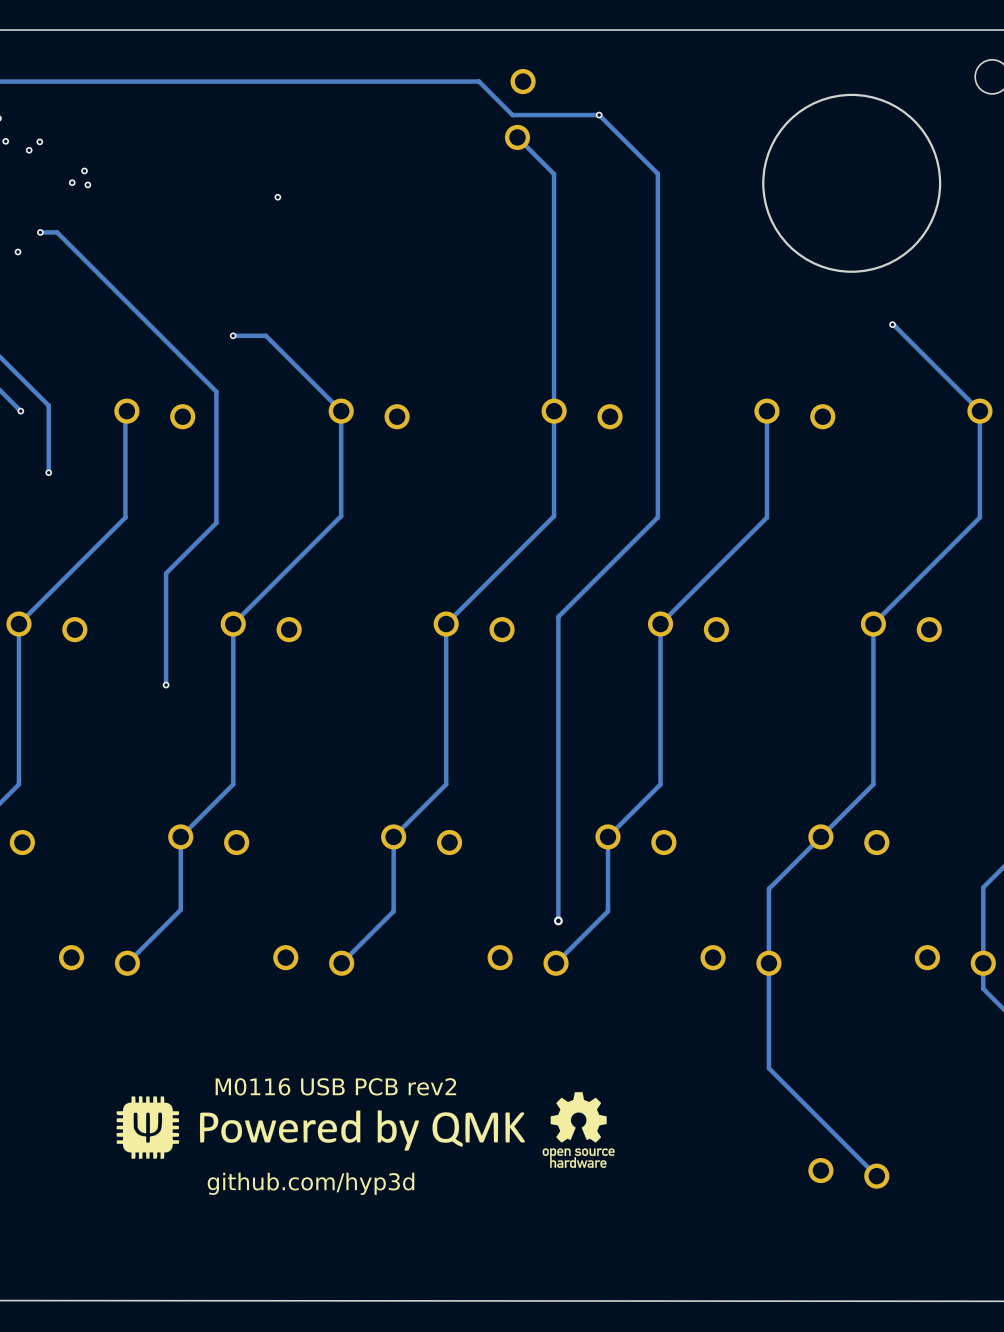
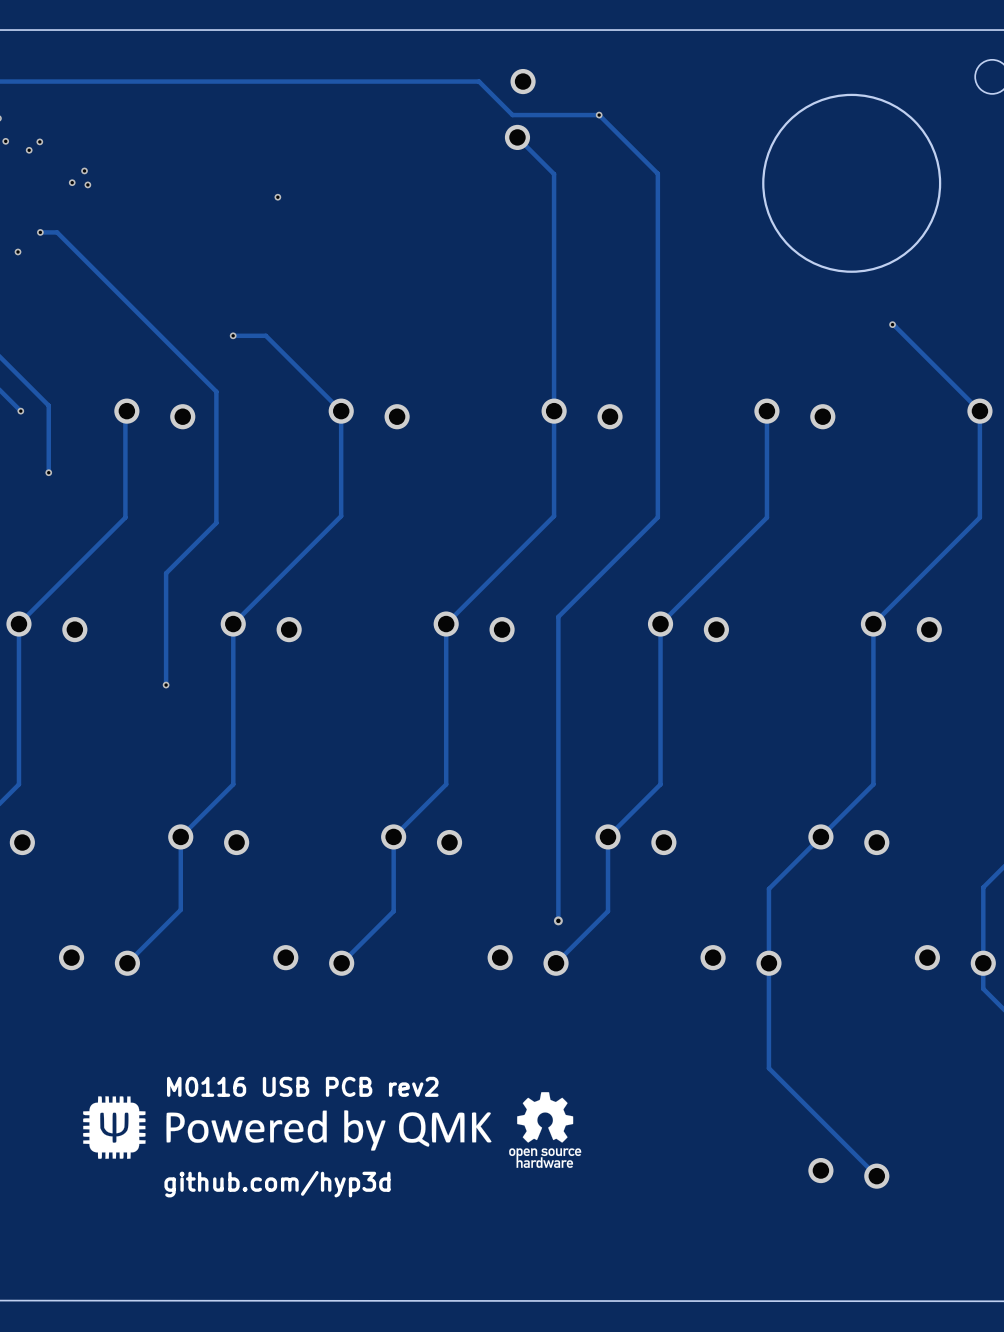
text position: M0116 USB PCB rev2 (335, 1086) -> M0116 USB PCB rev2 (302, 1086)
drawing position: (320, 1127) -> (287, 1127)
drawing position: (578, 1130) -> (545, 1130)
text position: github.com/hyp3d (310, 1183) -> github.com/hyp3d (277, 1184)

